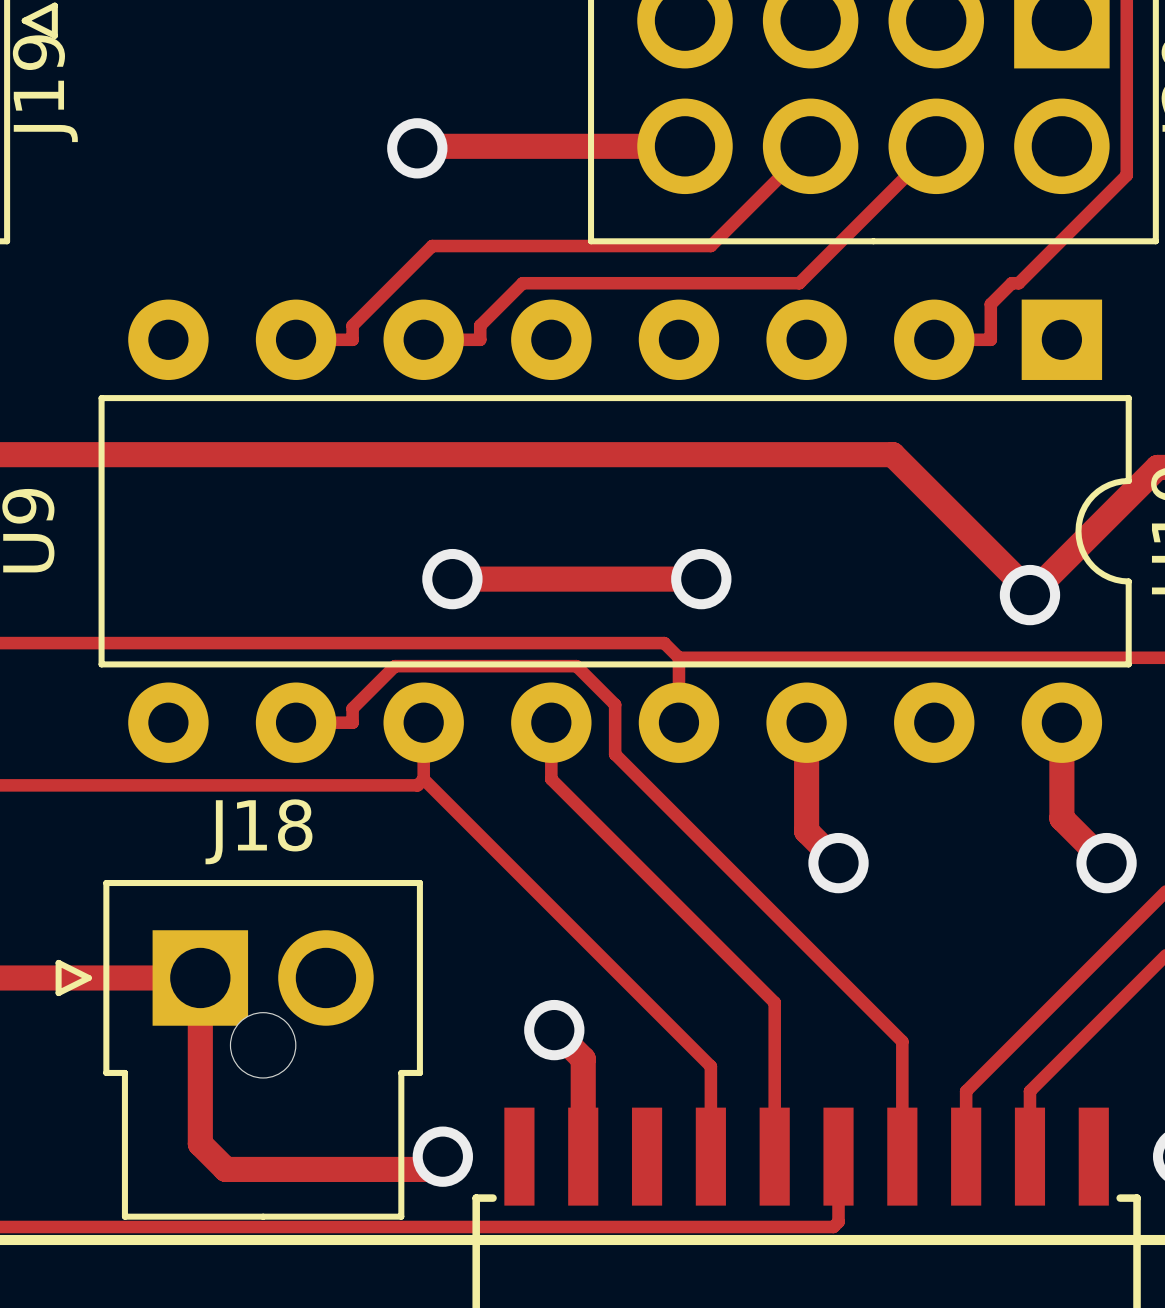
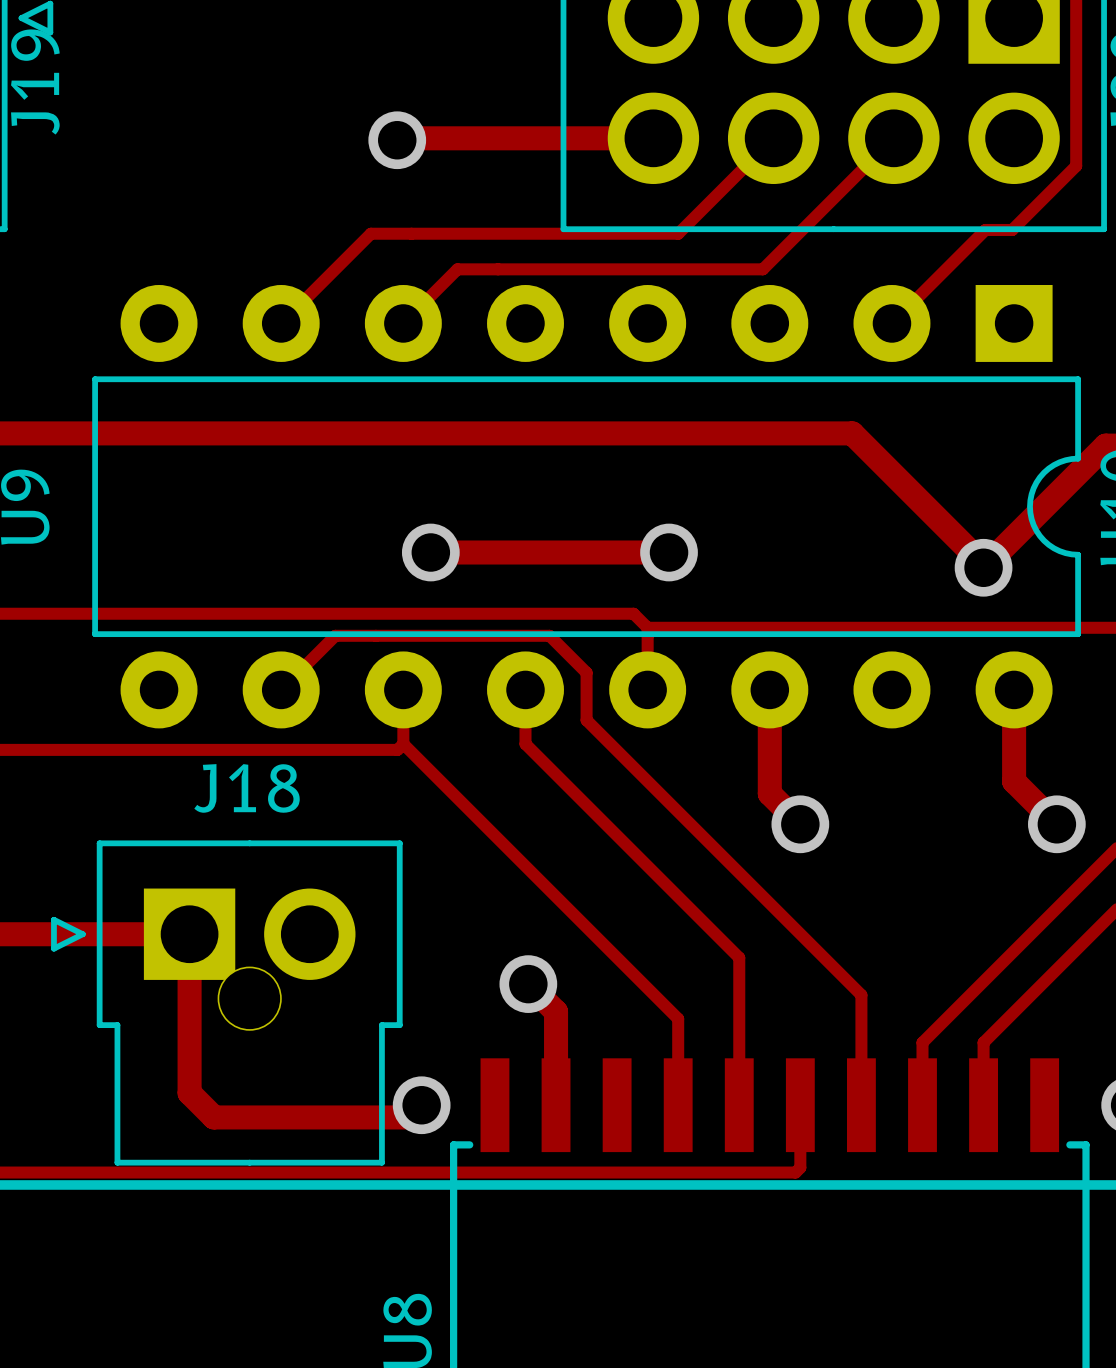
track: (1059, 242) (1018, 283) (1011, 283) (990, 304) (990, 339) (934, 339) -> (1012, 229) (985, 229) (891, 323)
track: (432, 246) (352, 325) (352, 339) (296, 339) -> (411, 233) (370, 233) (281, 323)
track: (522, 283) (480, 325) (480, 339) (423, 339) -> (498, 269) (457, 269) (403, 323)
track: (395, 666) (352, 708) (352, 722) (296, 722) -> (375, 635) (335, 635) (281, 689)

